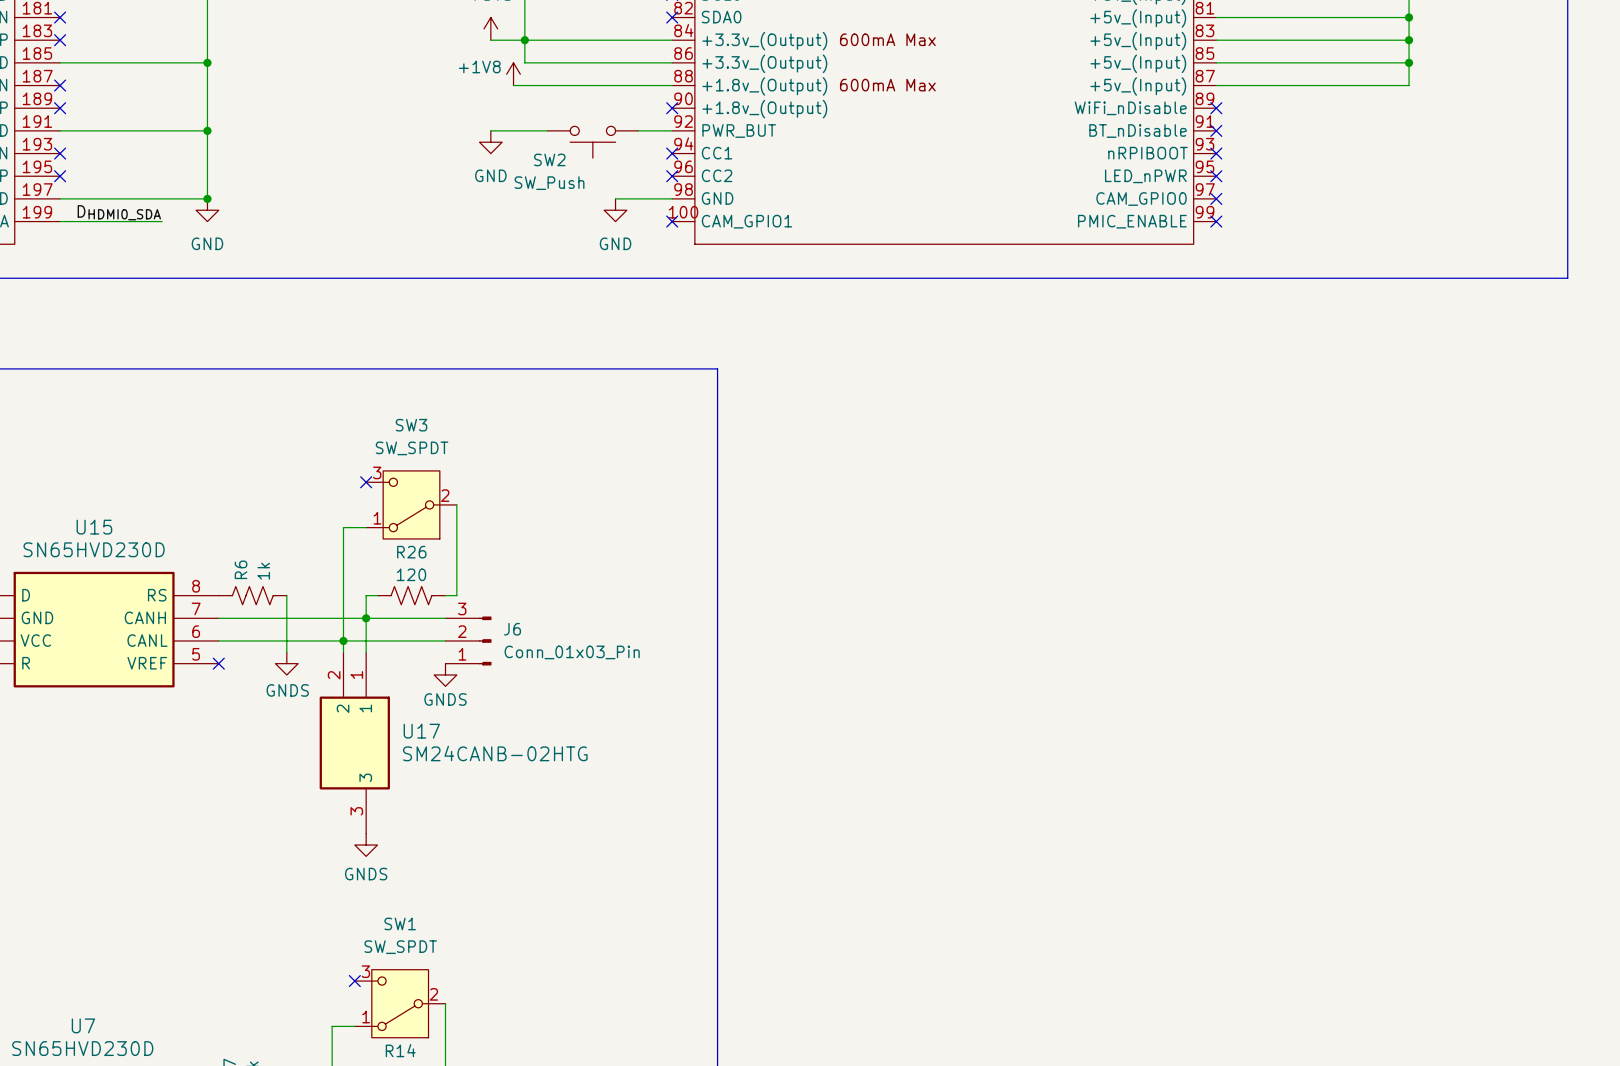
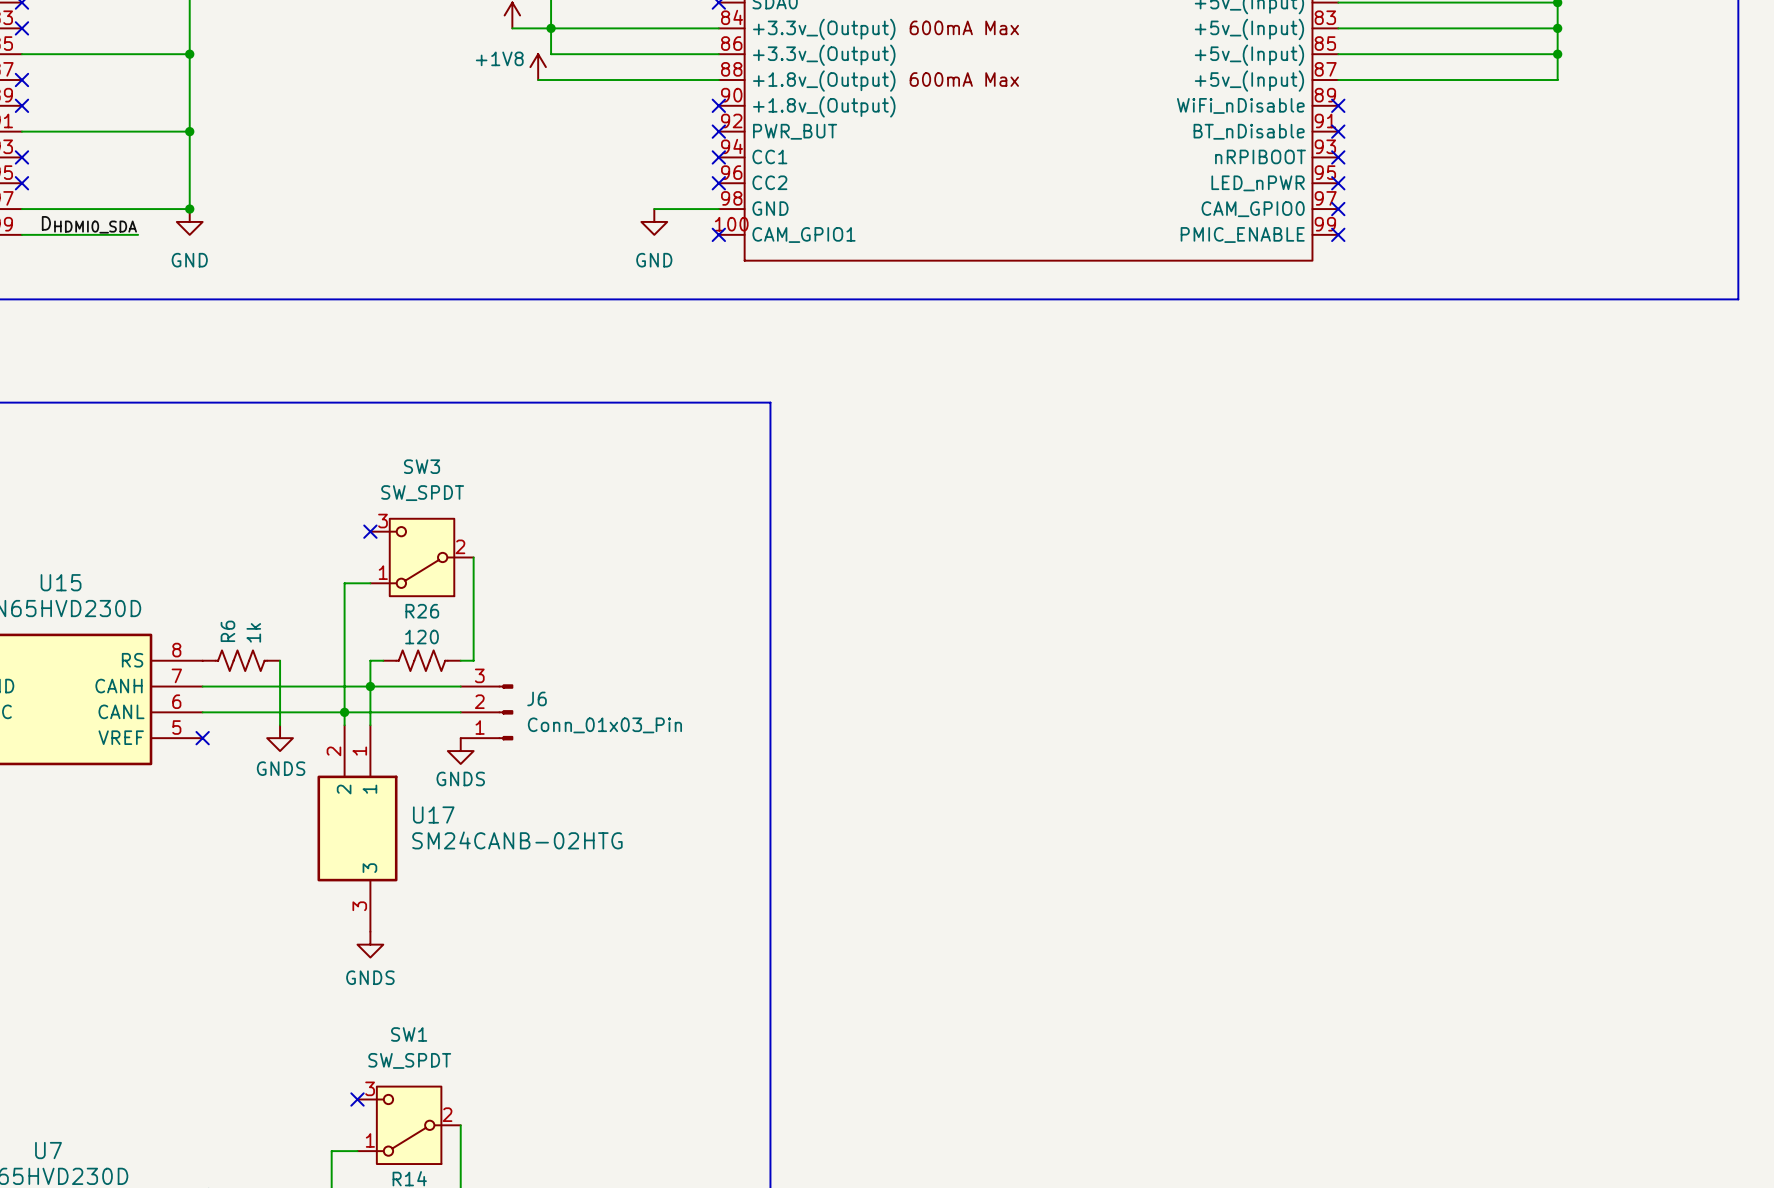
wire: (490, 130) (547, 130) -> none
wire: (638, 130) (672, 130) -> none
no-connect mark: none -> (718, 131)
power symbol: GND (490, 142) -> none
SW2: SW_Push (592, 142) -> none

